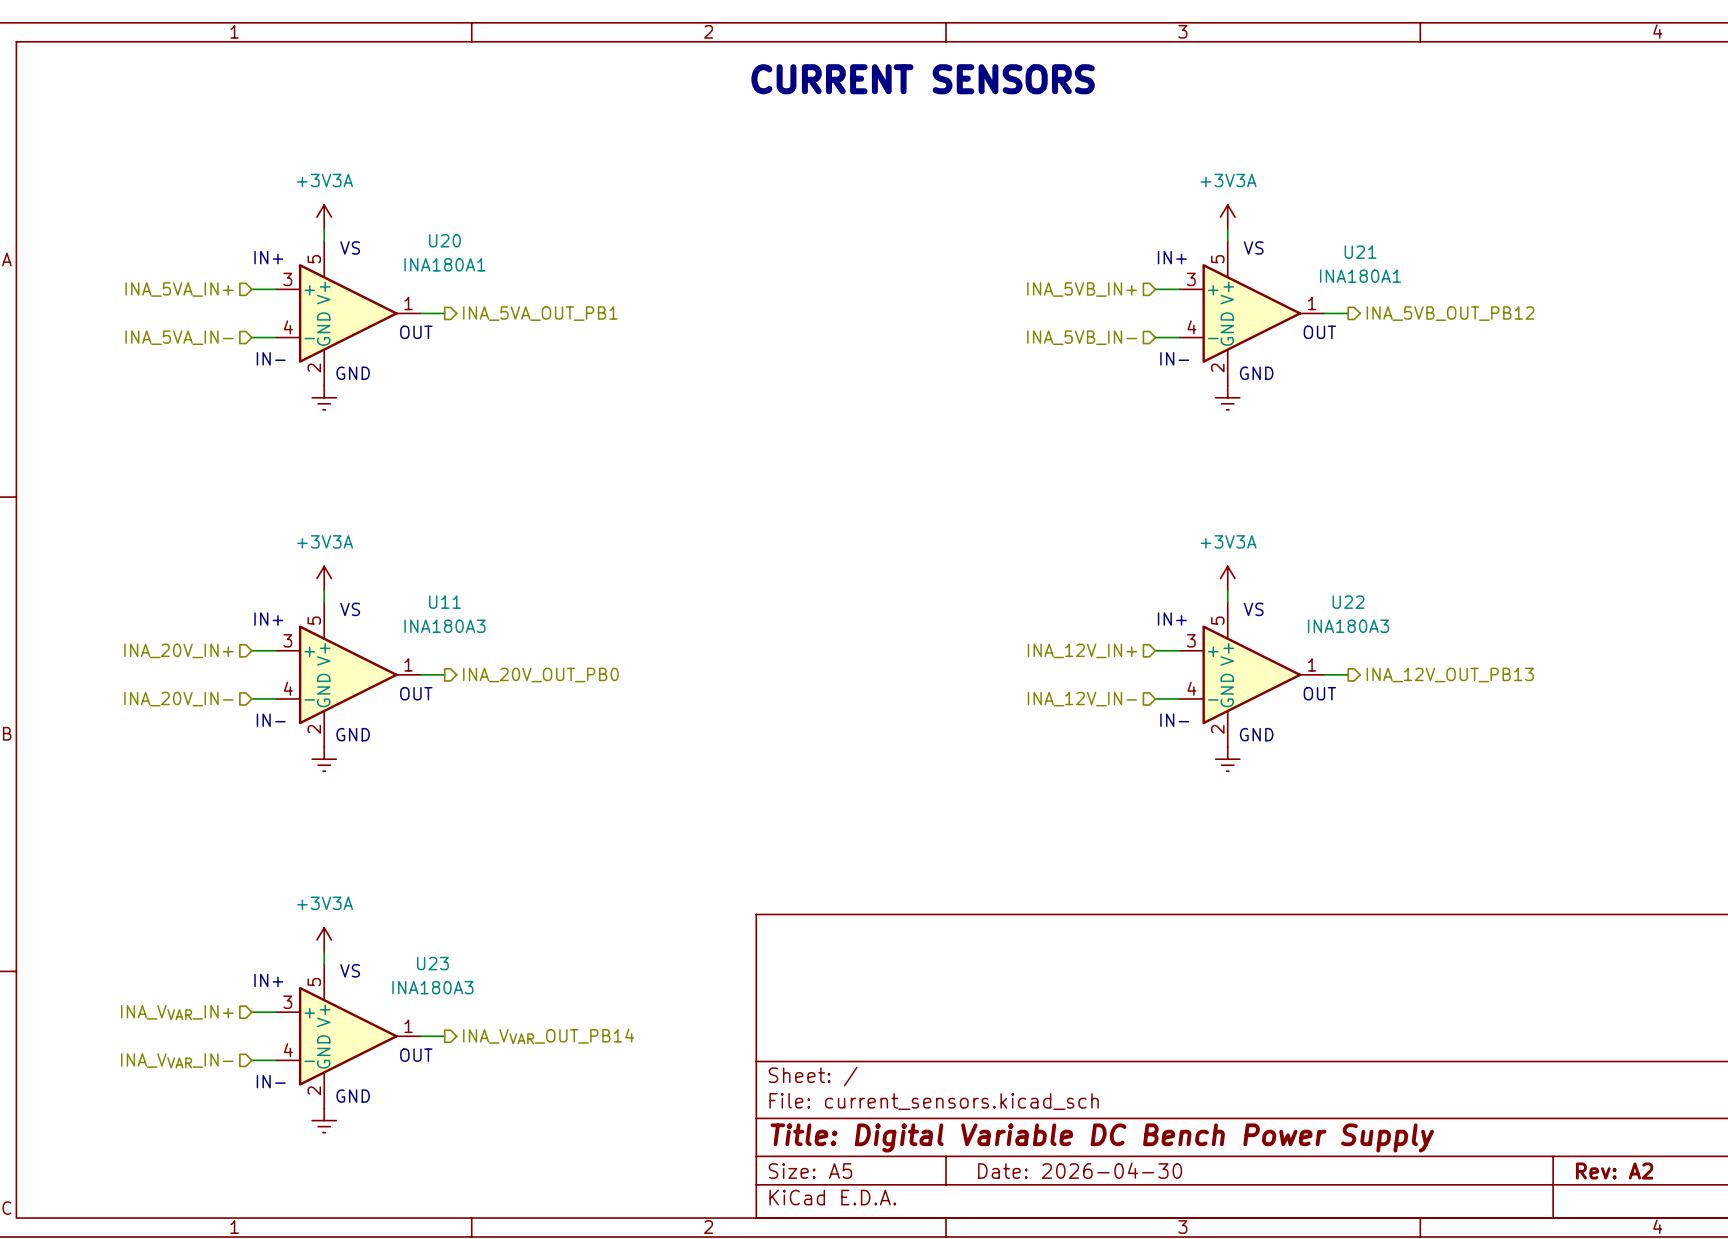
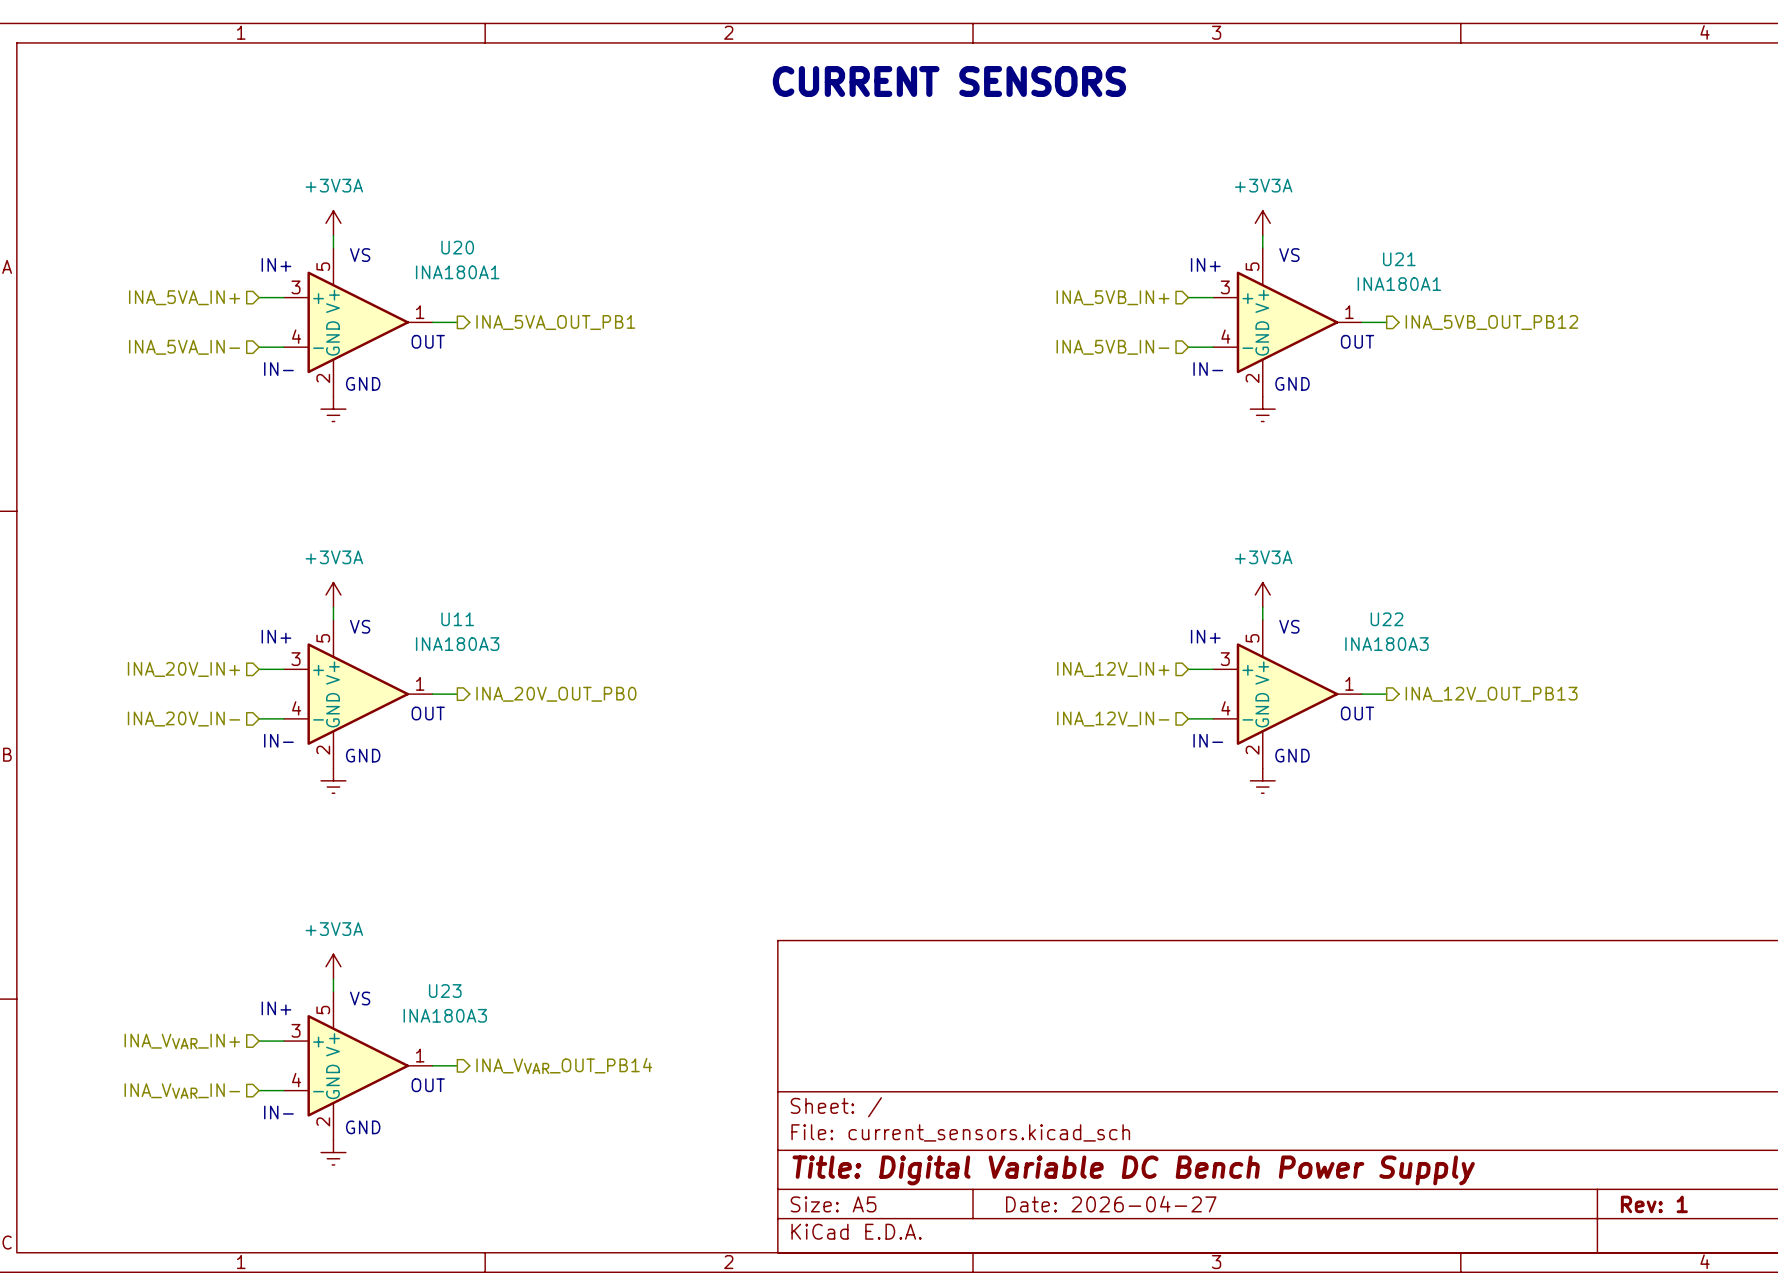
title block: Date: 2026-04-30 (1080, 1170) -> Date: 2026-04-27 (1111, 1204)
title block: Rev: A2 (1614, 1171) -> Rev: 1 (1654, 1204)

